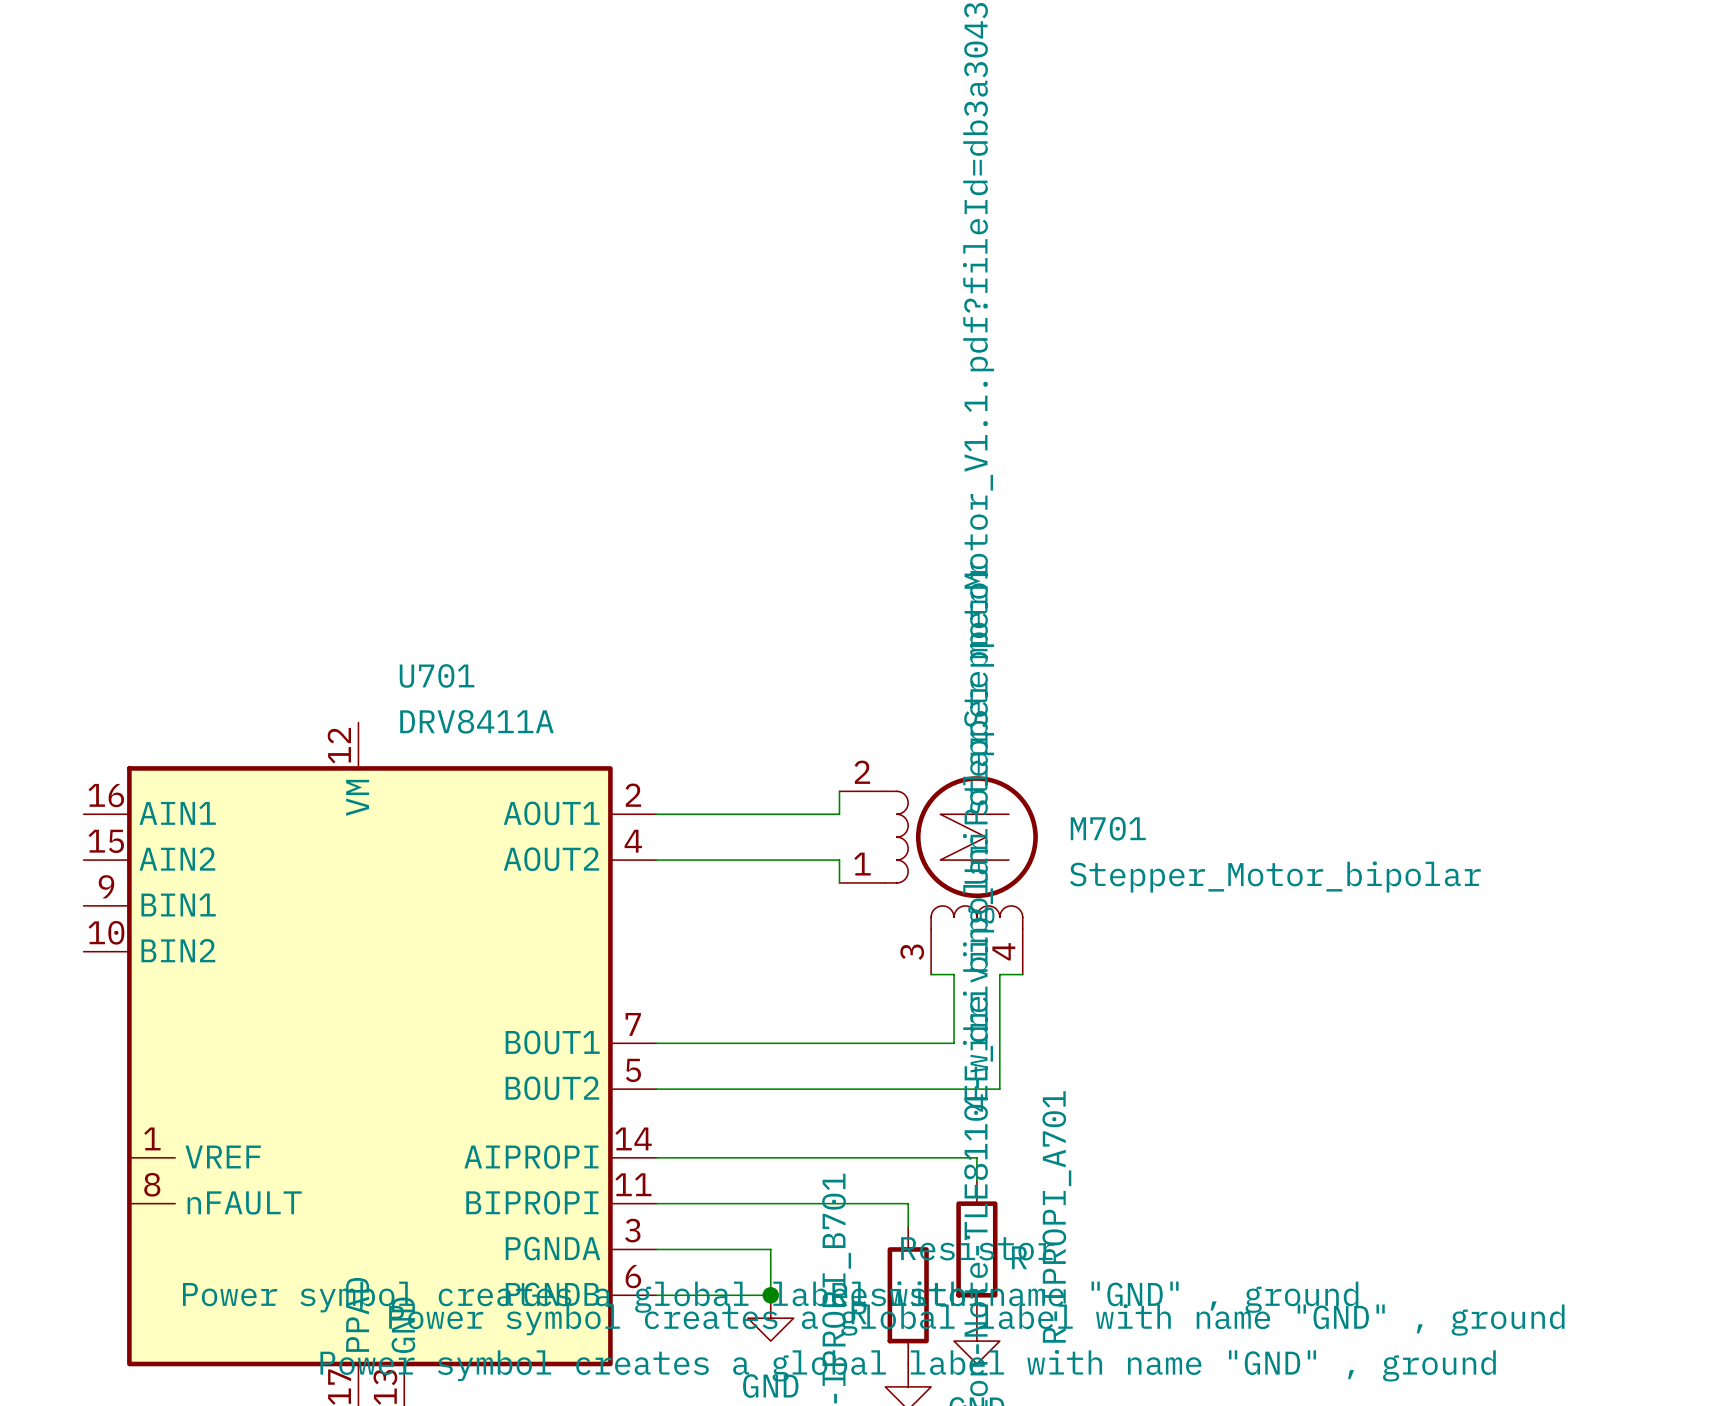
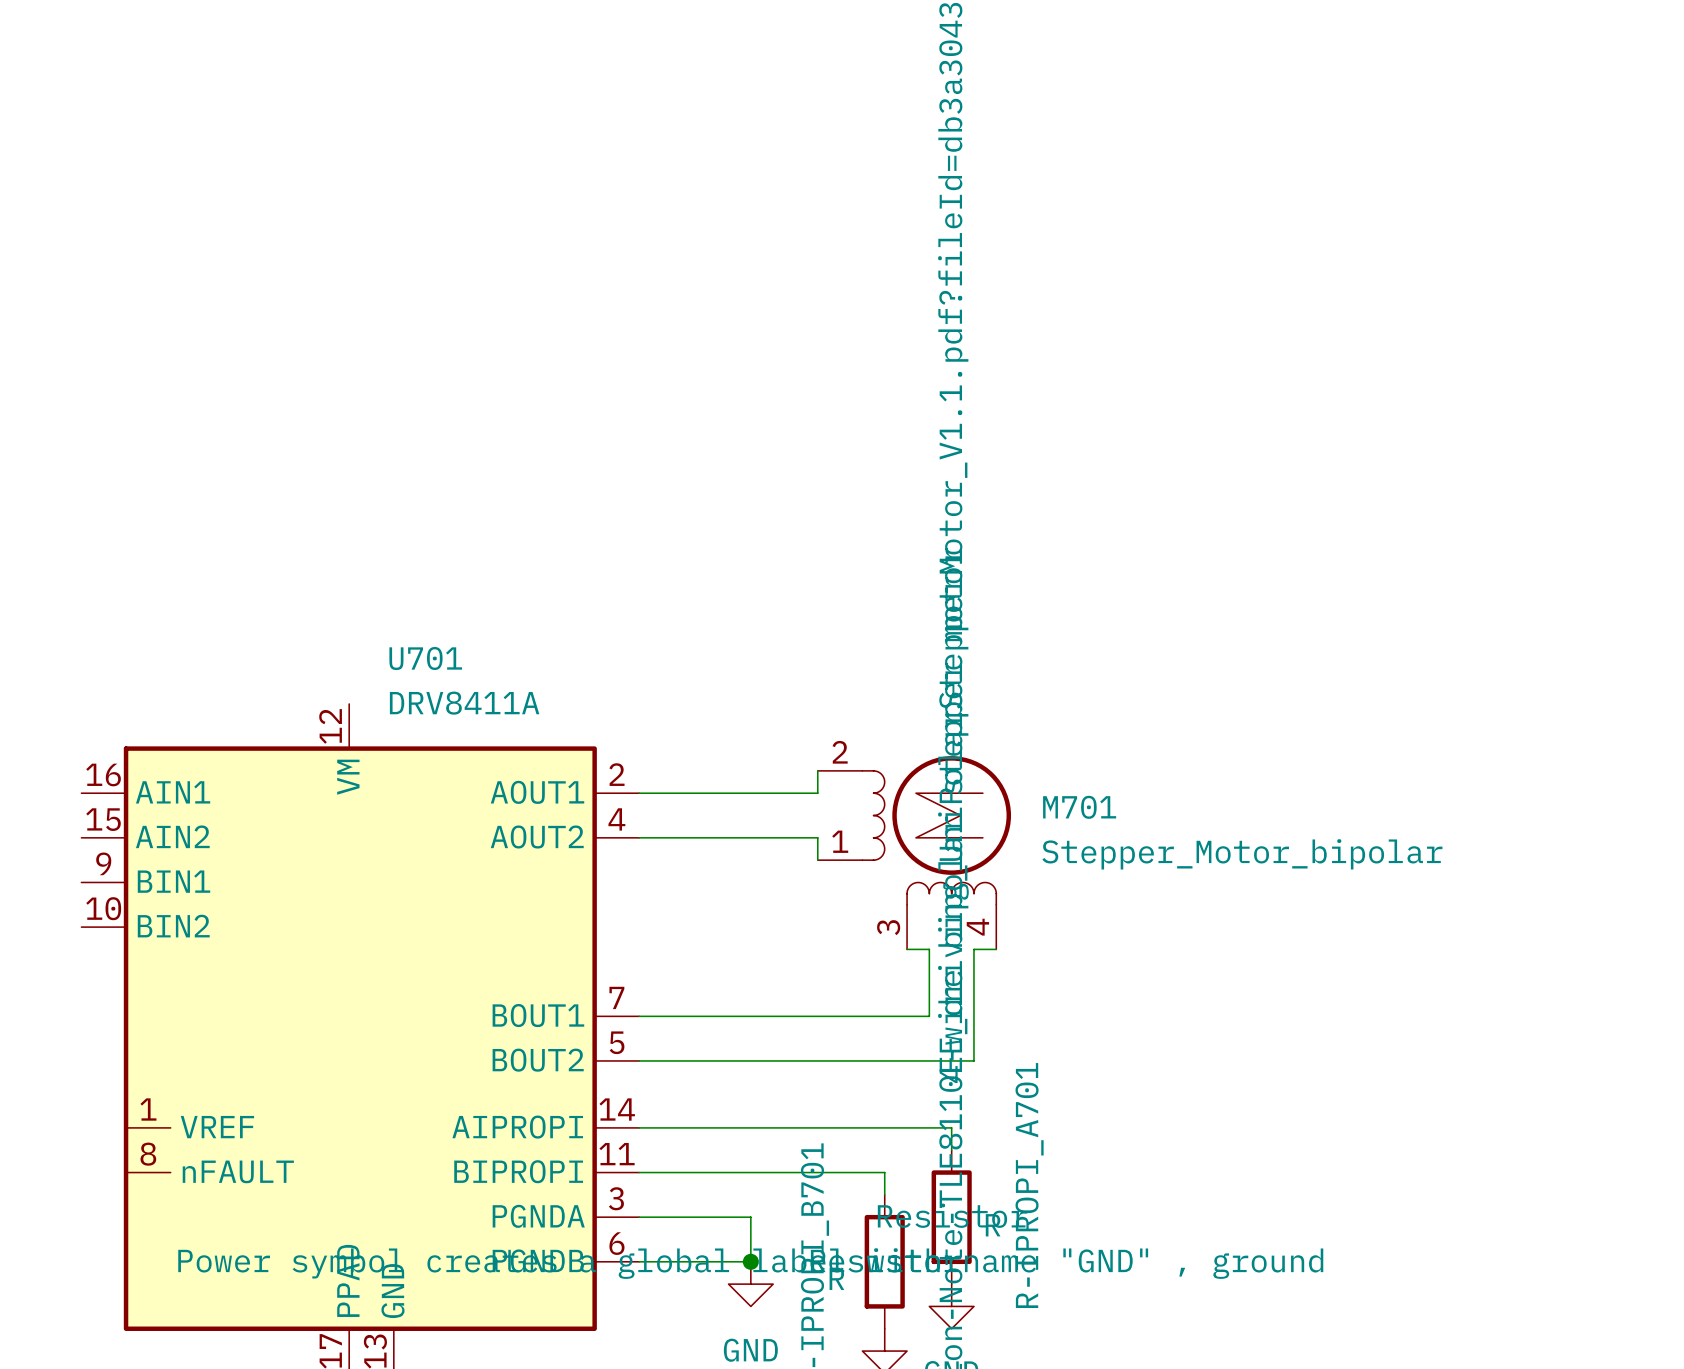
power symbol text: Power symbol creates a global label with name "GND" , ground (976, 1319) -> none
power symbol text: Power symbol creates a global label with name "GND" , ground (908, 1365) -> none

